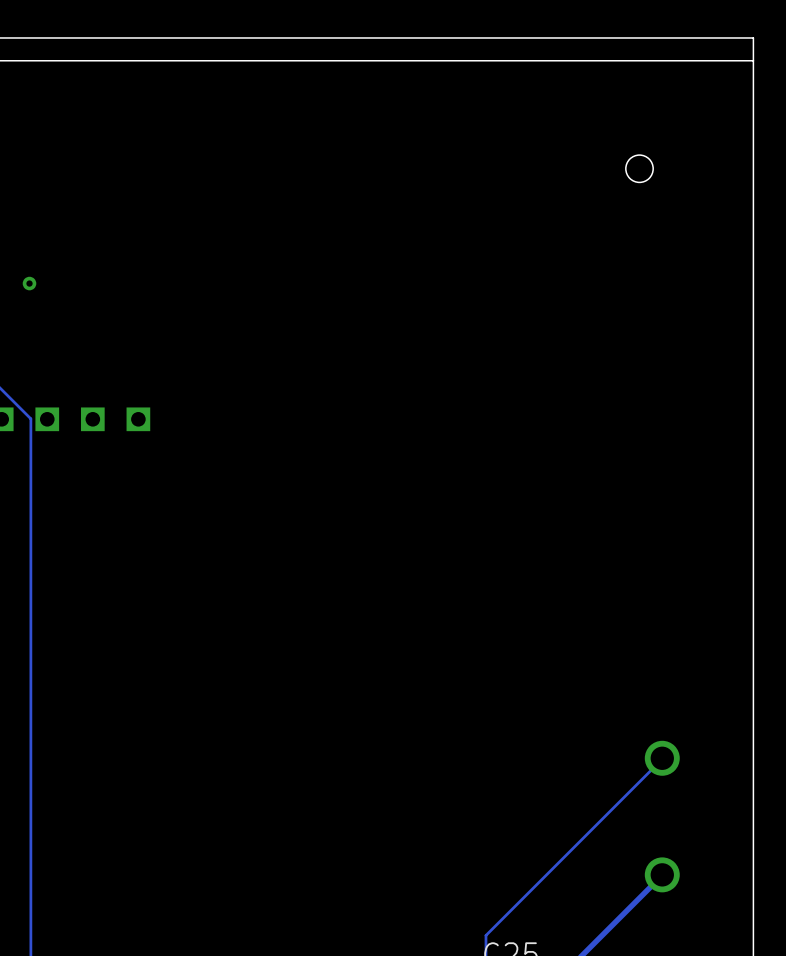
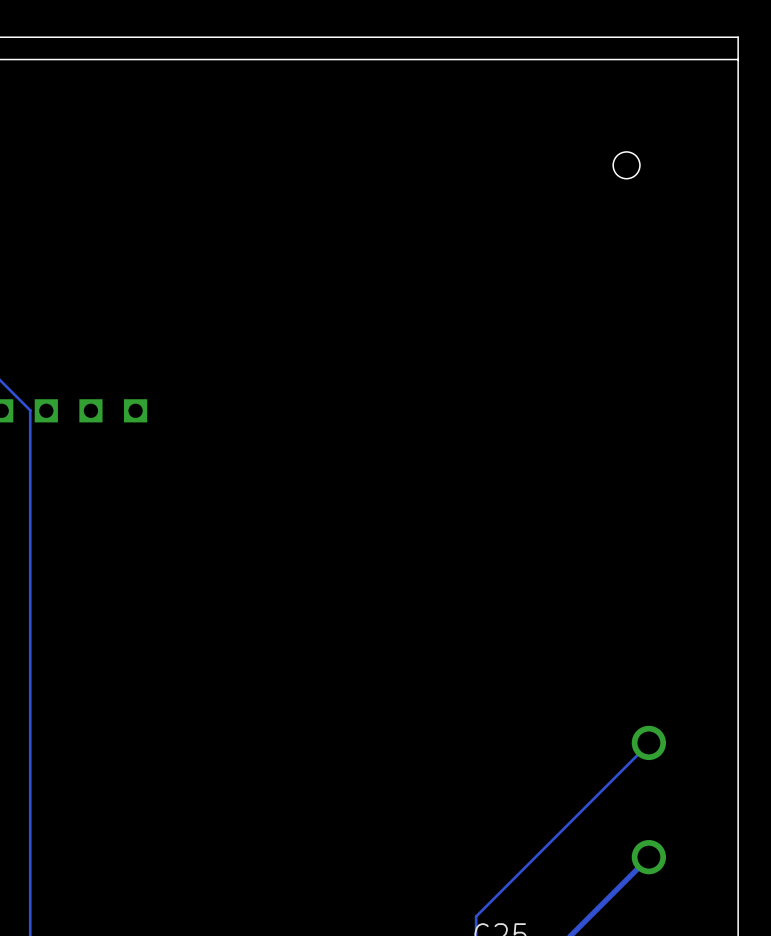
via: (29, 283) -> none

